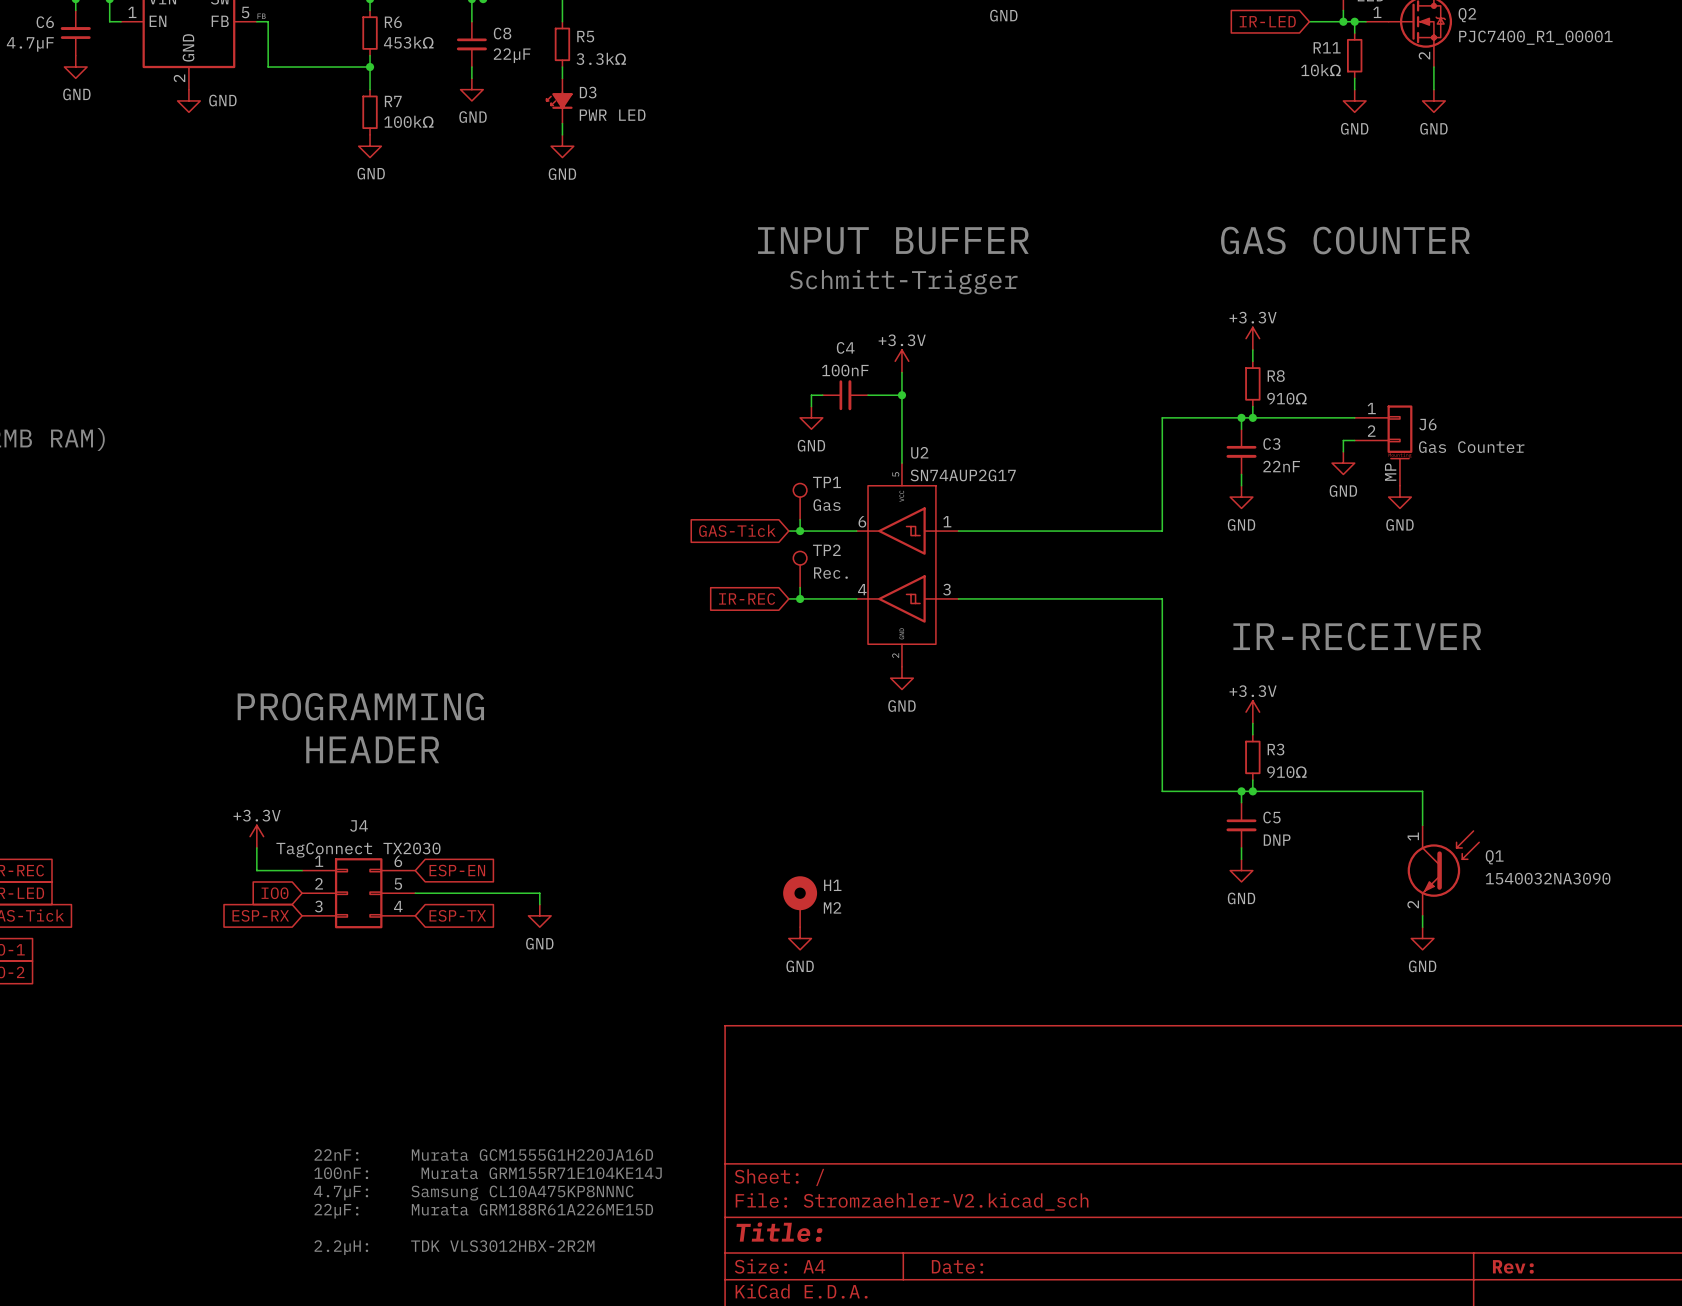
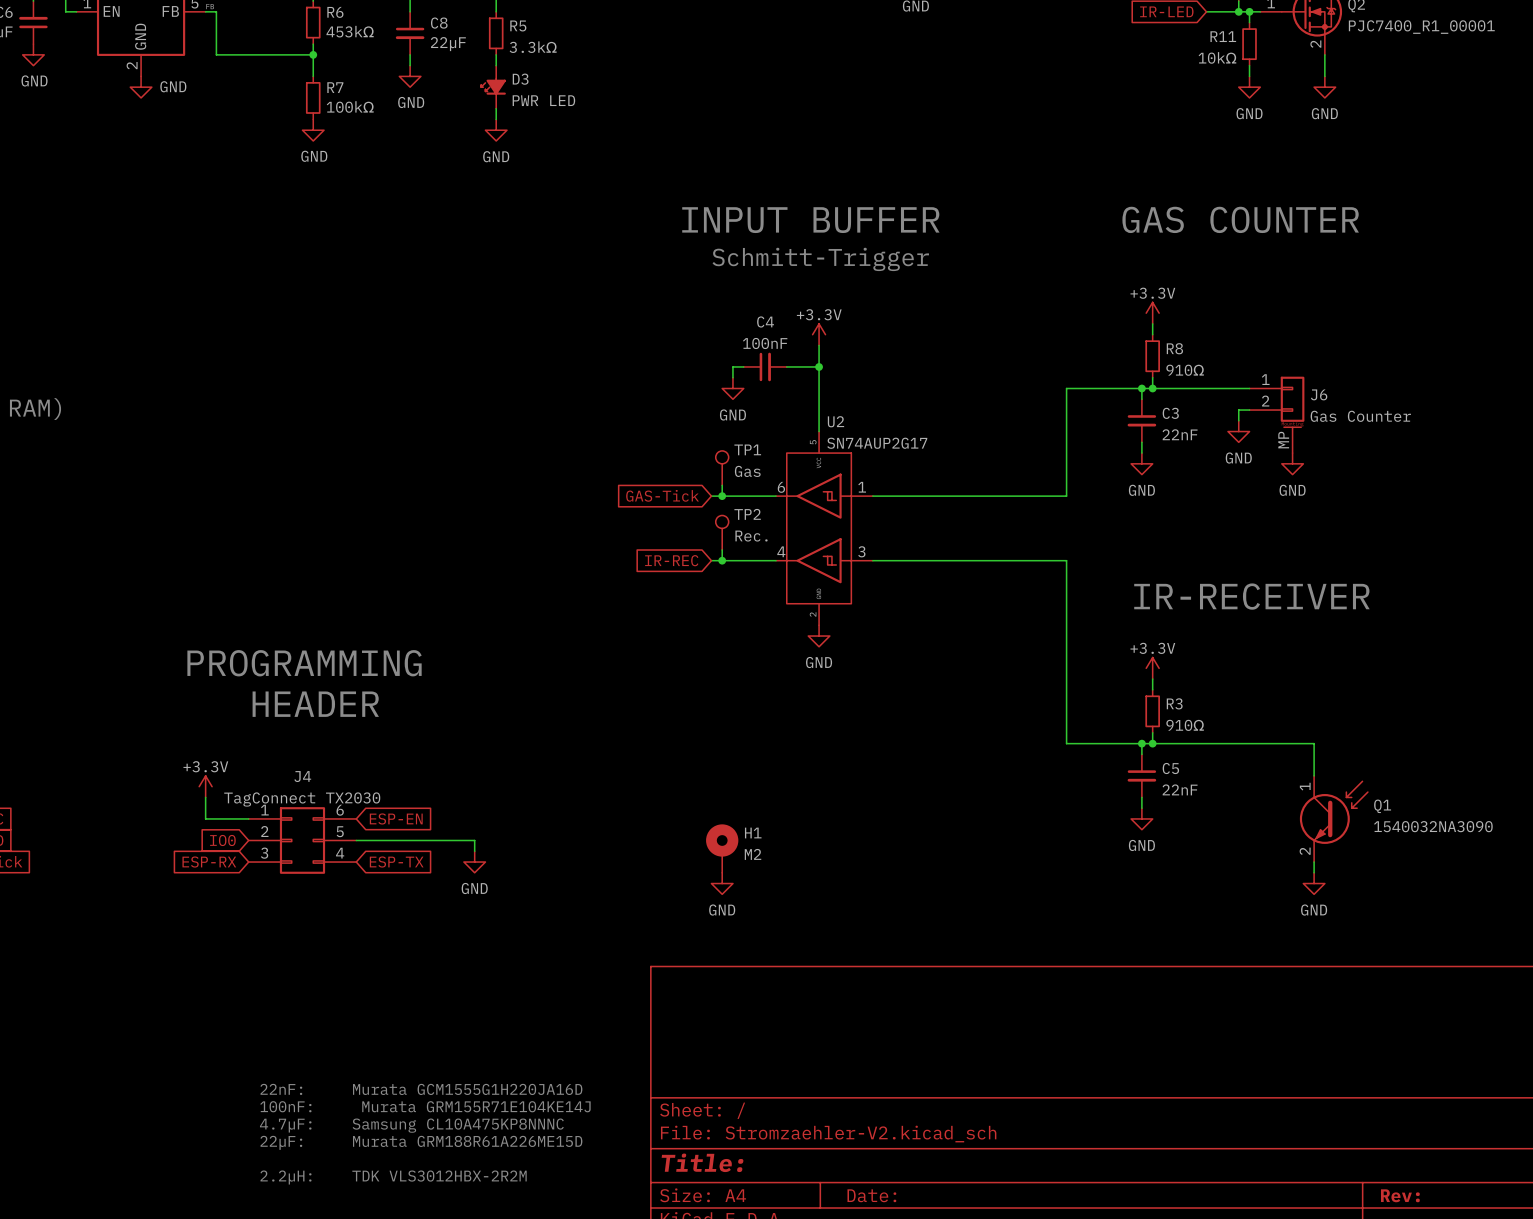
C5 value: DNP (1277, 840) -> 22nF (1180, 789)

